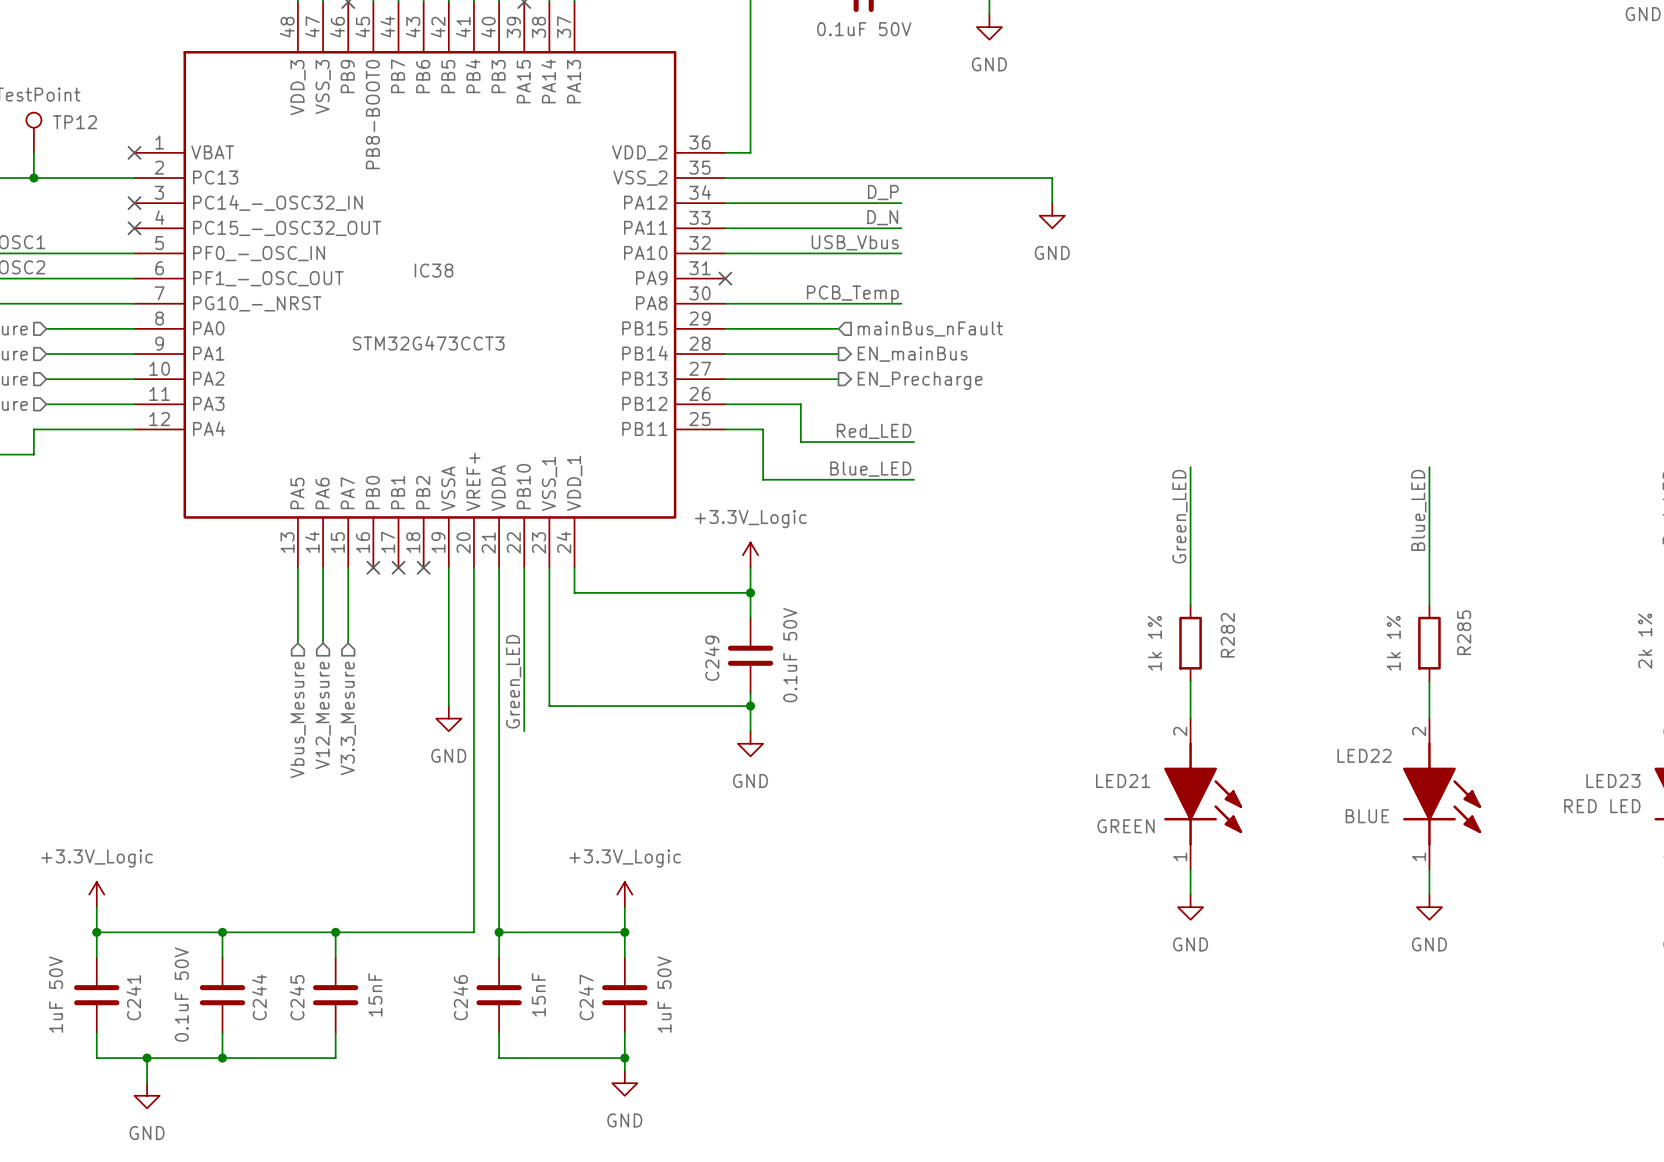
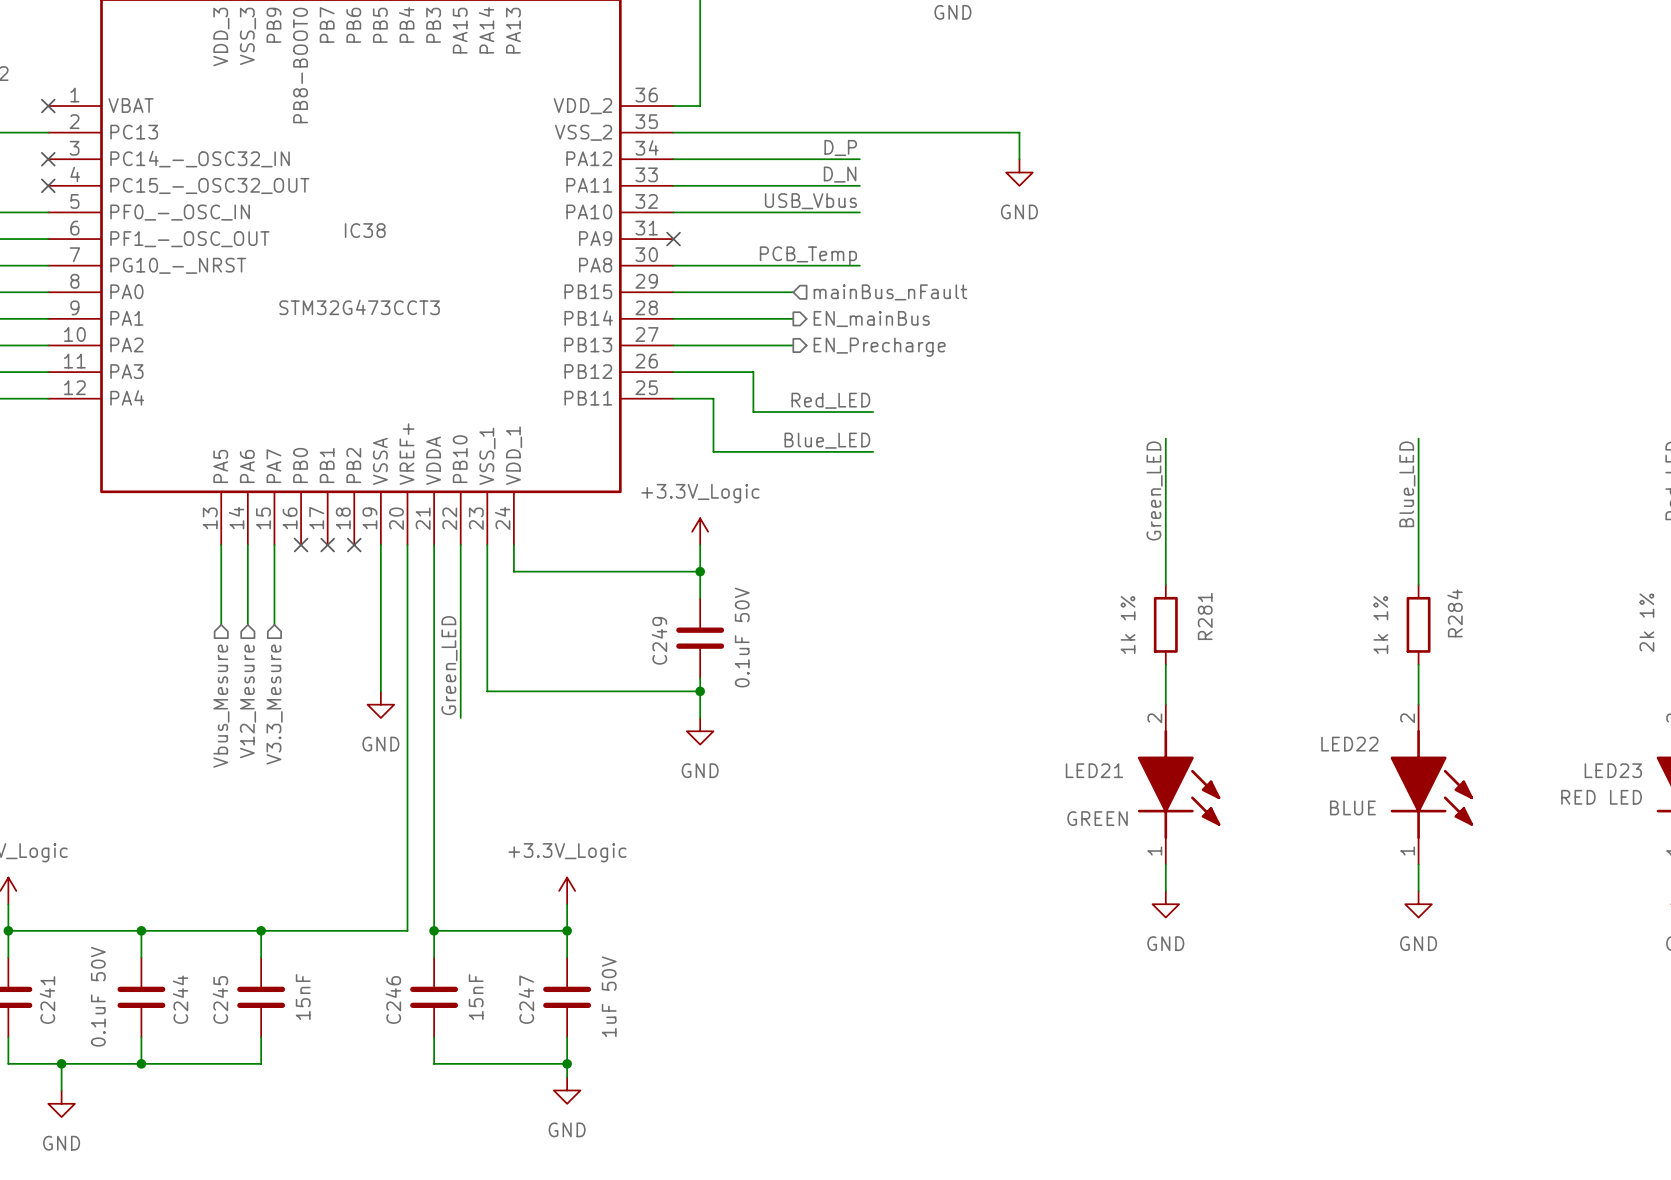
R285 name: R285 (1464, 632) -> R284 (1455, 613)
R282 name: R282 (1227, 635) -> R281 (1205, 616)

